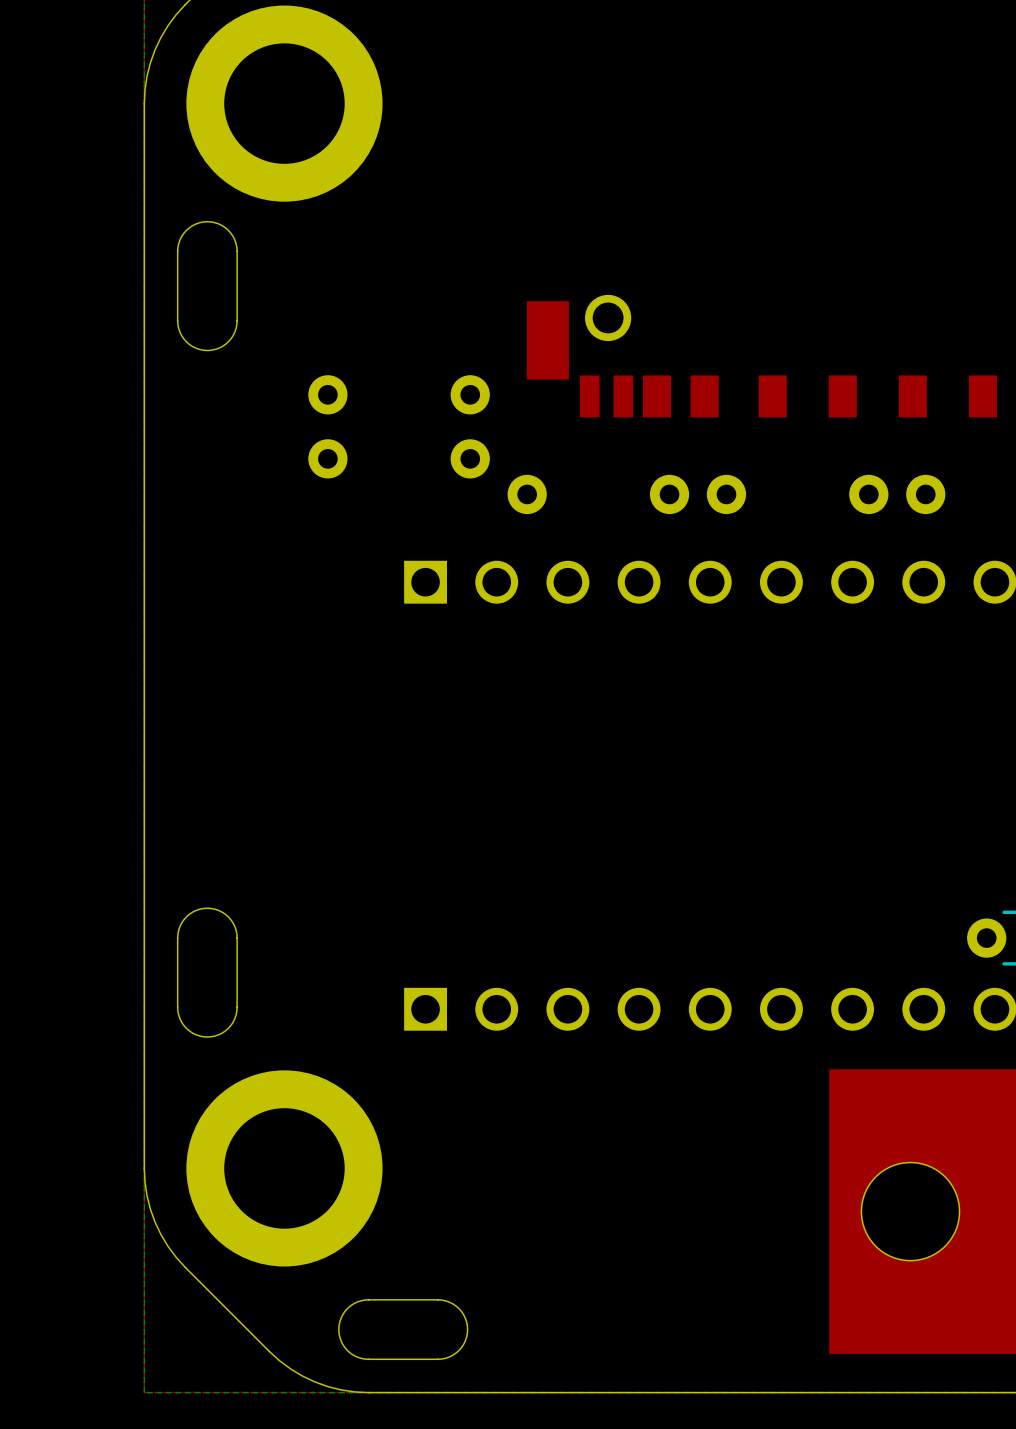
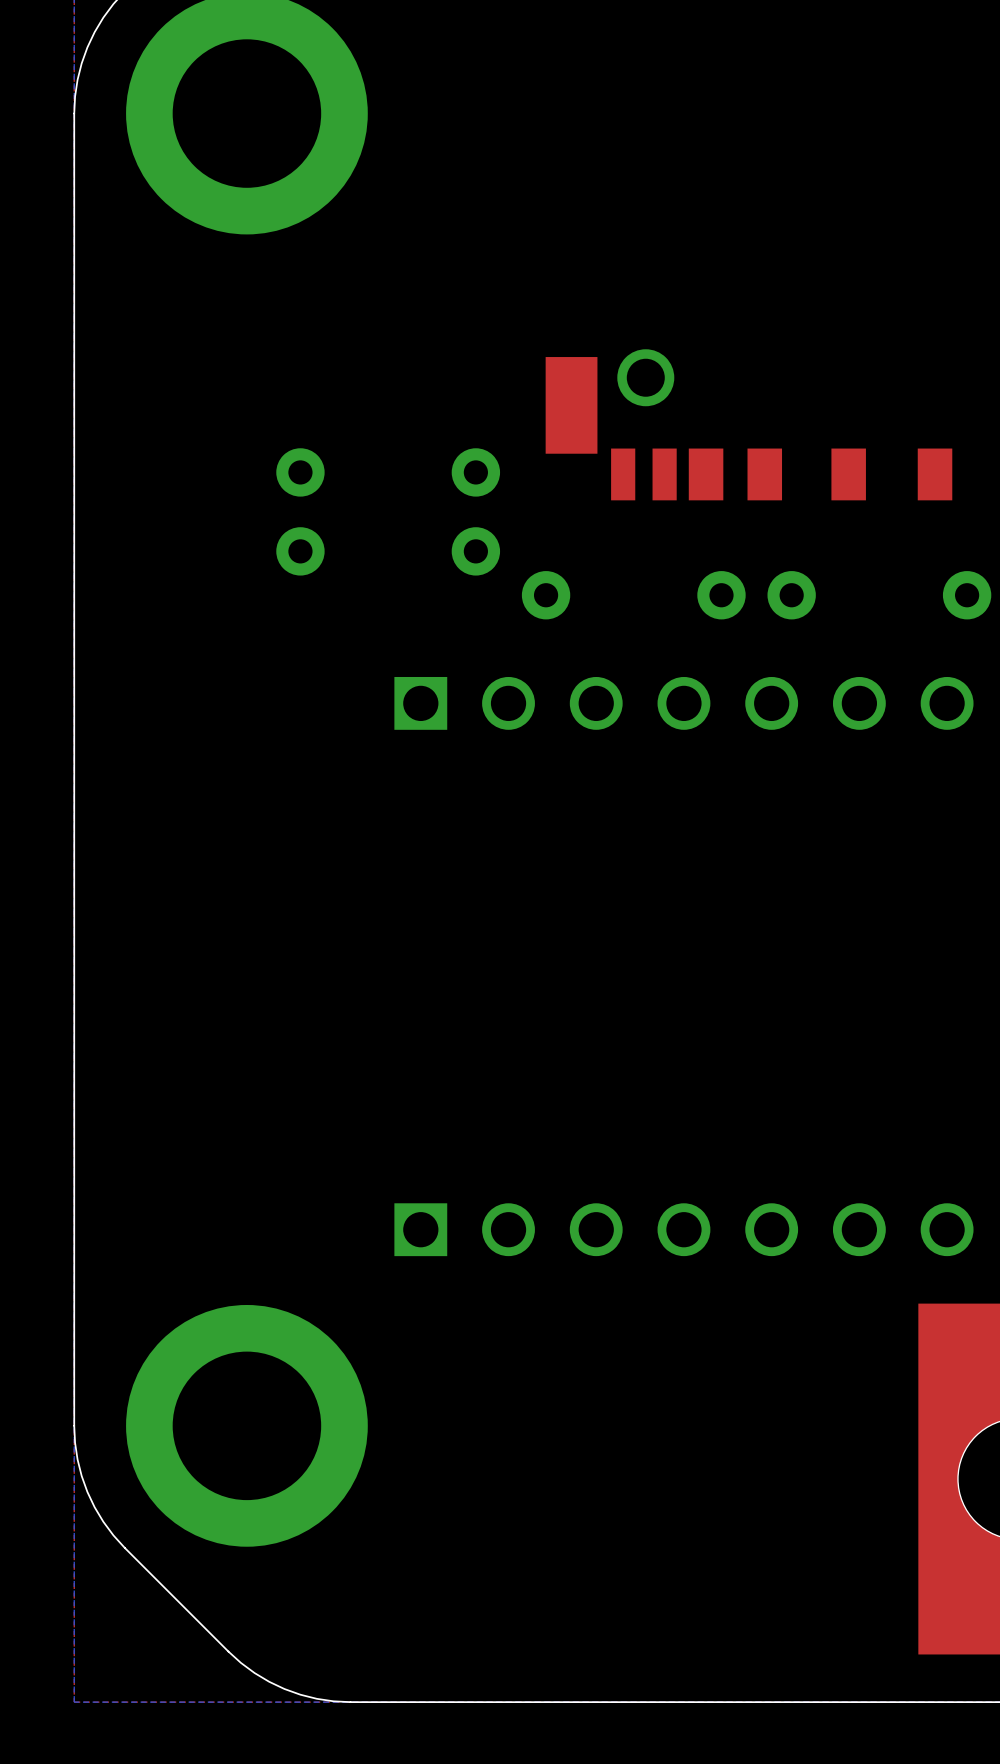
board edge: (237, 251) (237, 320) (234, 332) (228, 341) (218, 348) (207, 350) (196, 348) (183, 338) (177, 324) (177, 251) (179, 240) (186, 230) (192, 225) (203, 221) (215, 222) (222, 225) (230, 233) (236, 243) (237, 251) -> none
board edge: (237, 937) (237, 1007) (234, 1018) (228, 1028) (218, 1034) (207, 1037) (196, 1034) (183, 1025) (177, 1011) (177, 937) (179, 926) (186, 916) (192, 912) (203, 908) (215, 909) (222, 912) (230, 919) (236, 930) (237, 937) -> none
board edge: (437, 1299) (368, 1299) (357, 1302) (347, 1308) (341, 1318) (338, 1329) (341, 1340) (350, 1353) (364, 1359) (437, 1359) (449, 1357) (455, 1353) (463, 1344) (467, 1333) (467, 1325) (463, 1314) (455, 1305) (445, 1300) (437, 1299) -> none

